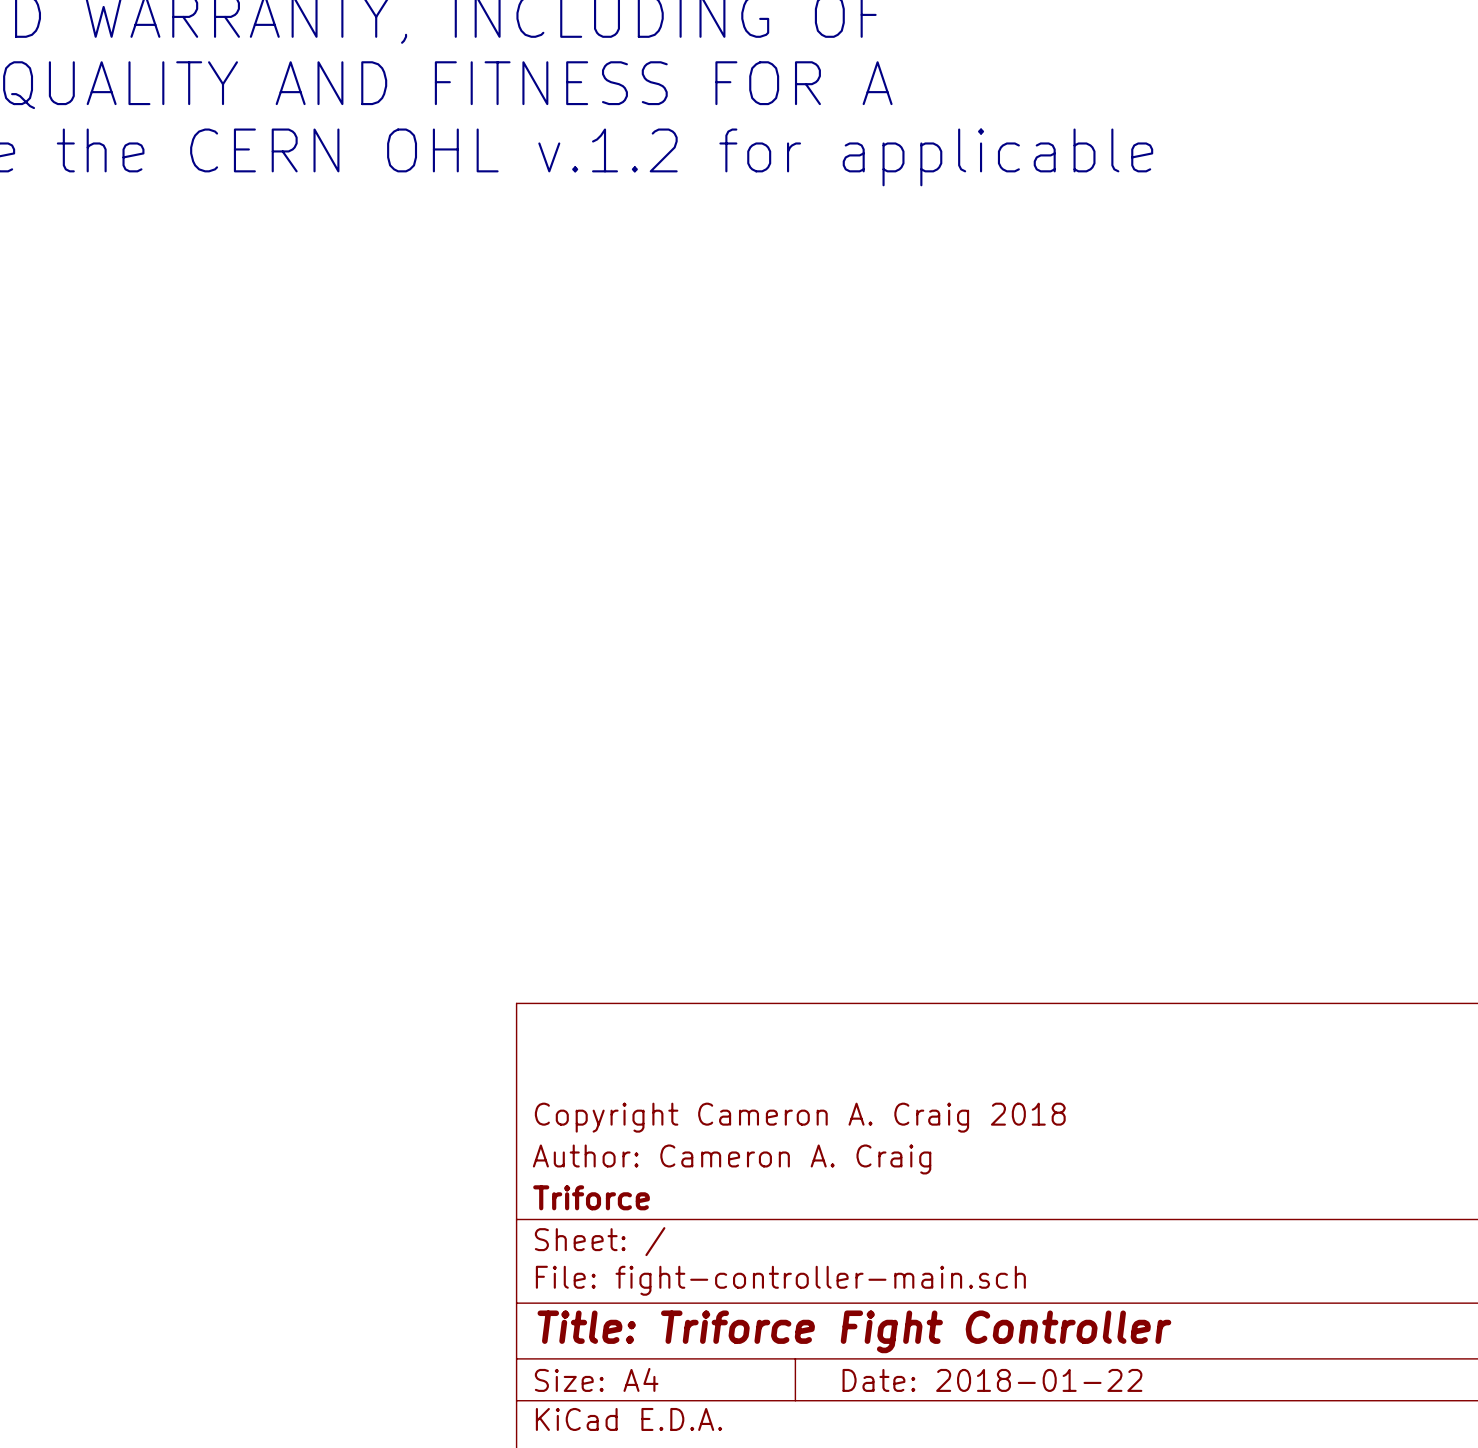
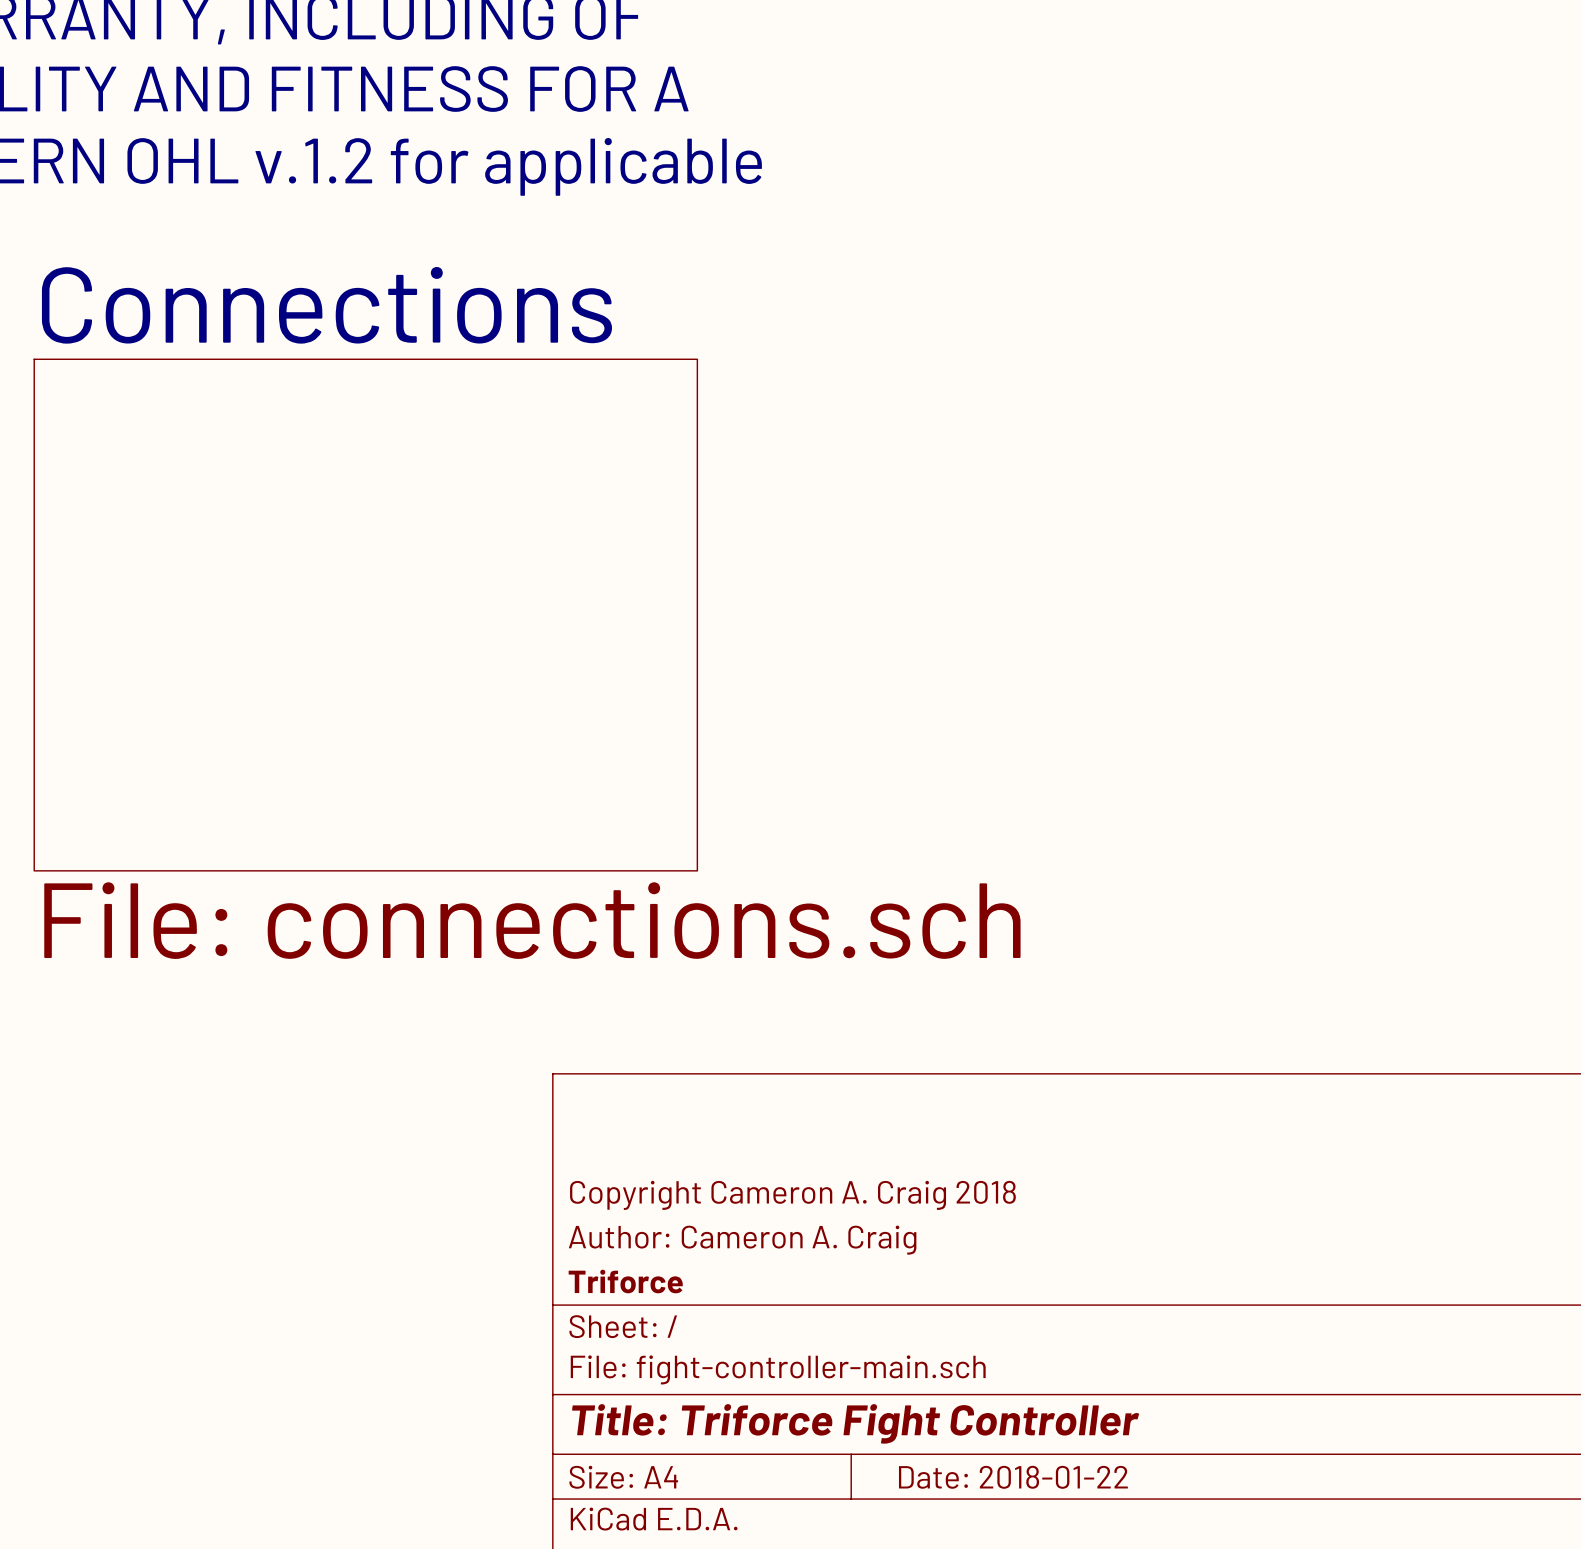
sheet Connections: none -> File: connections.sch (365, 615)

